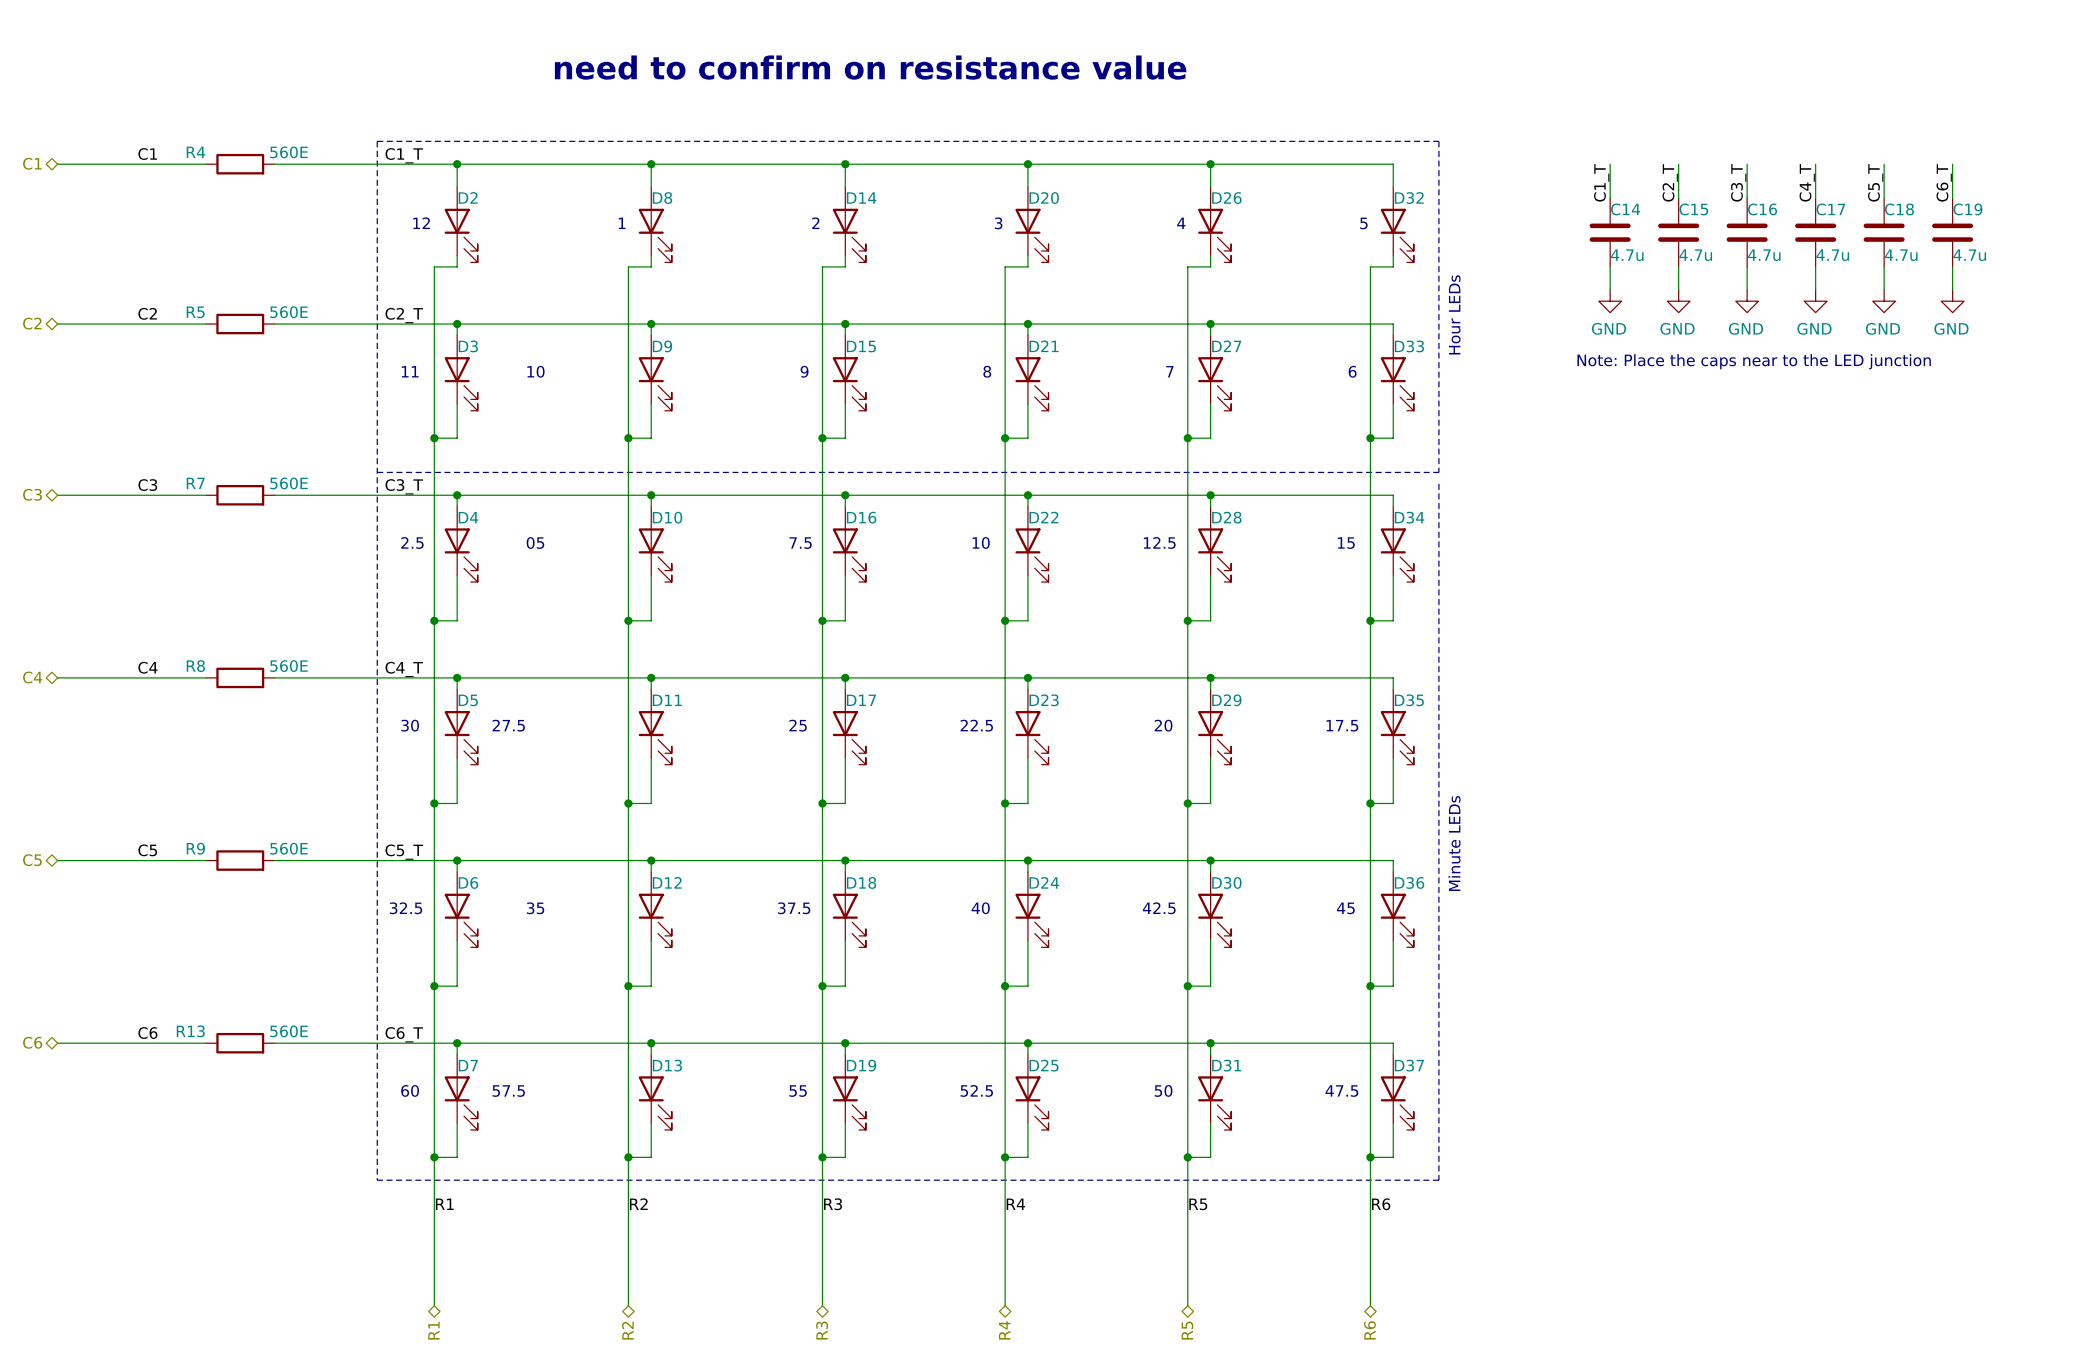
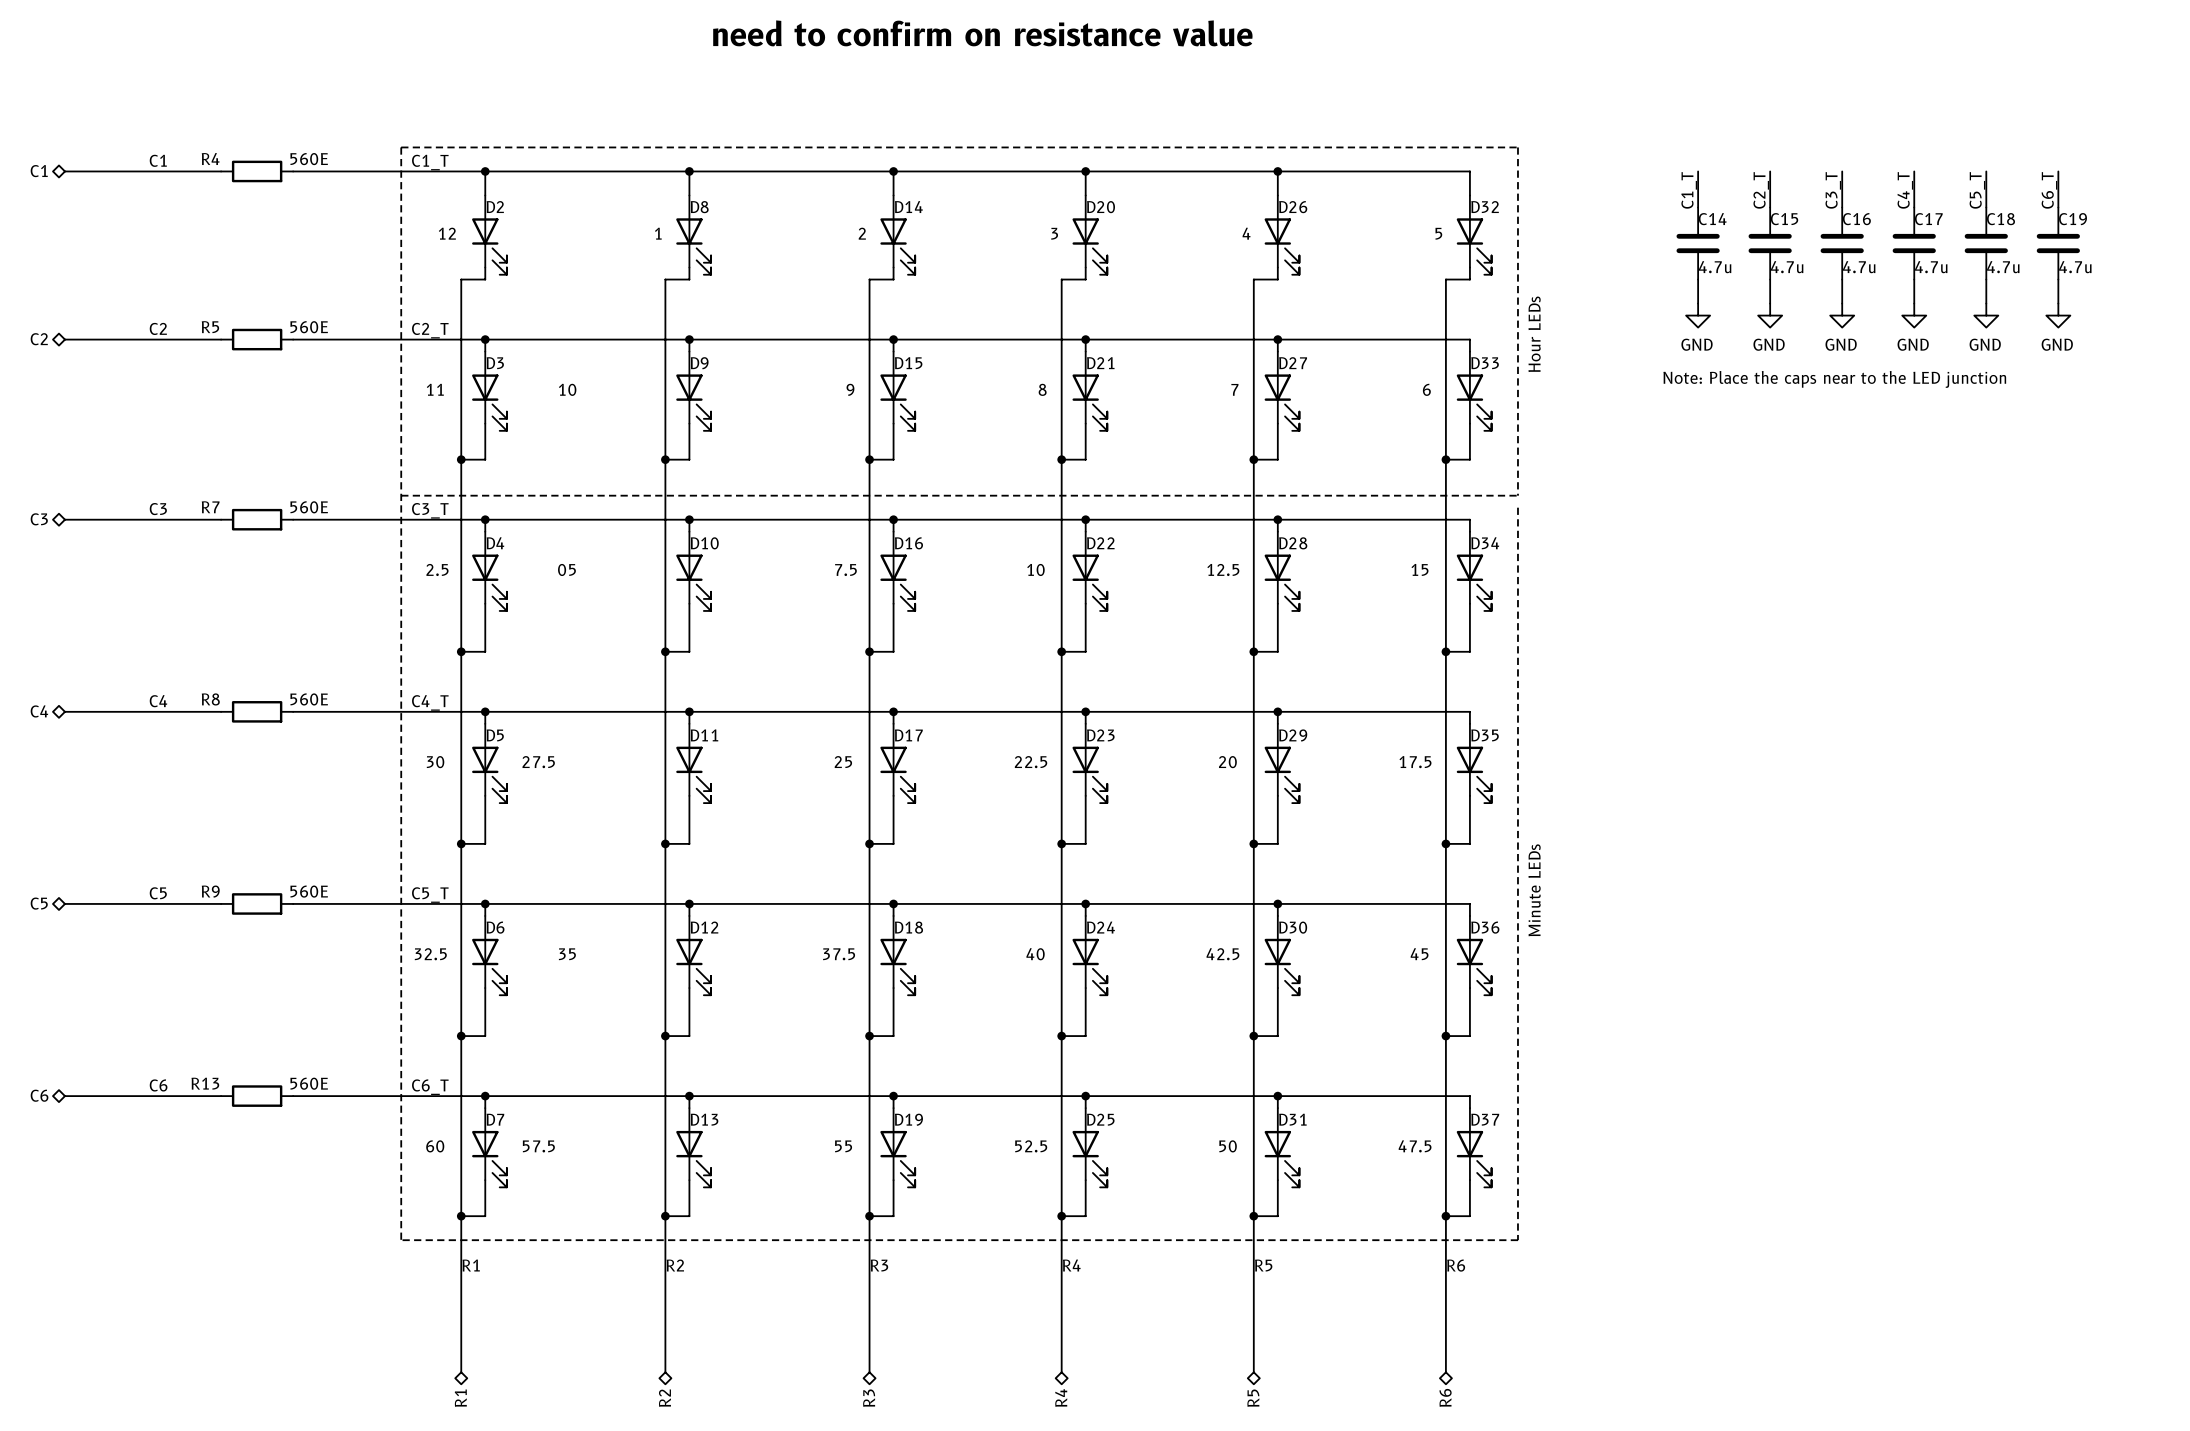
text position: need to confirm on resistance value (870, 67) -> need to confirm on resistance value (982, 33)

